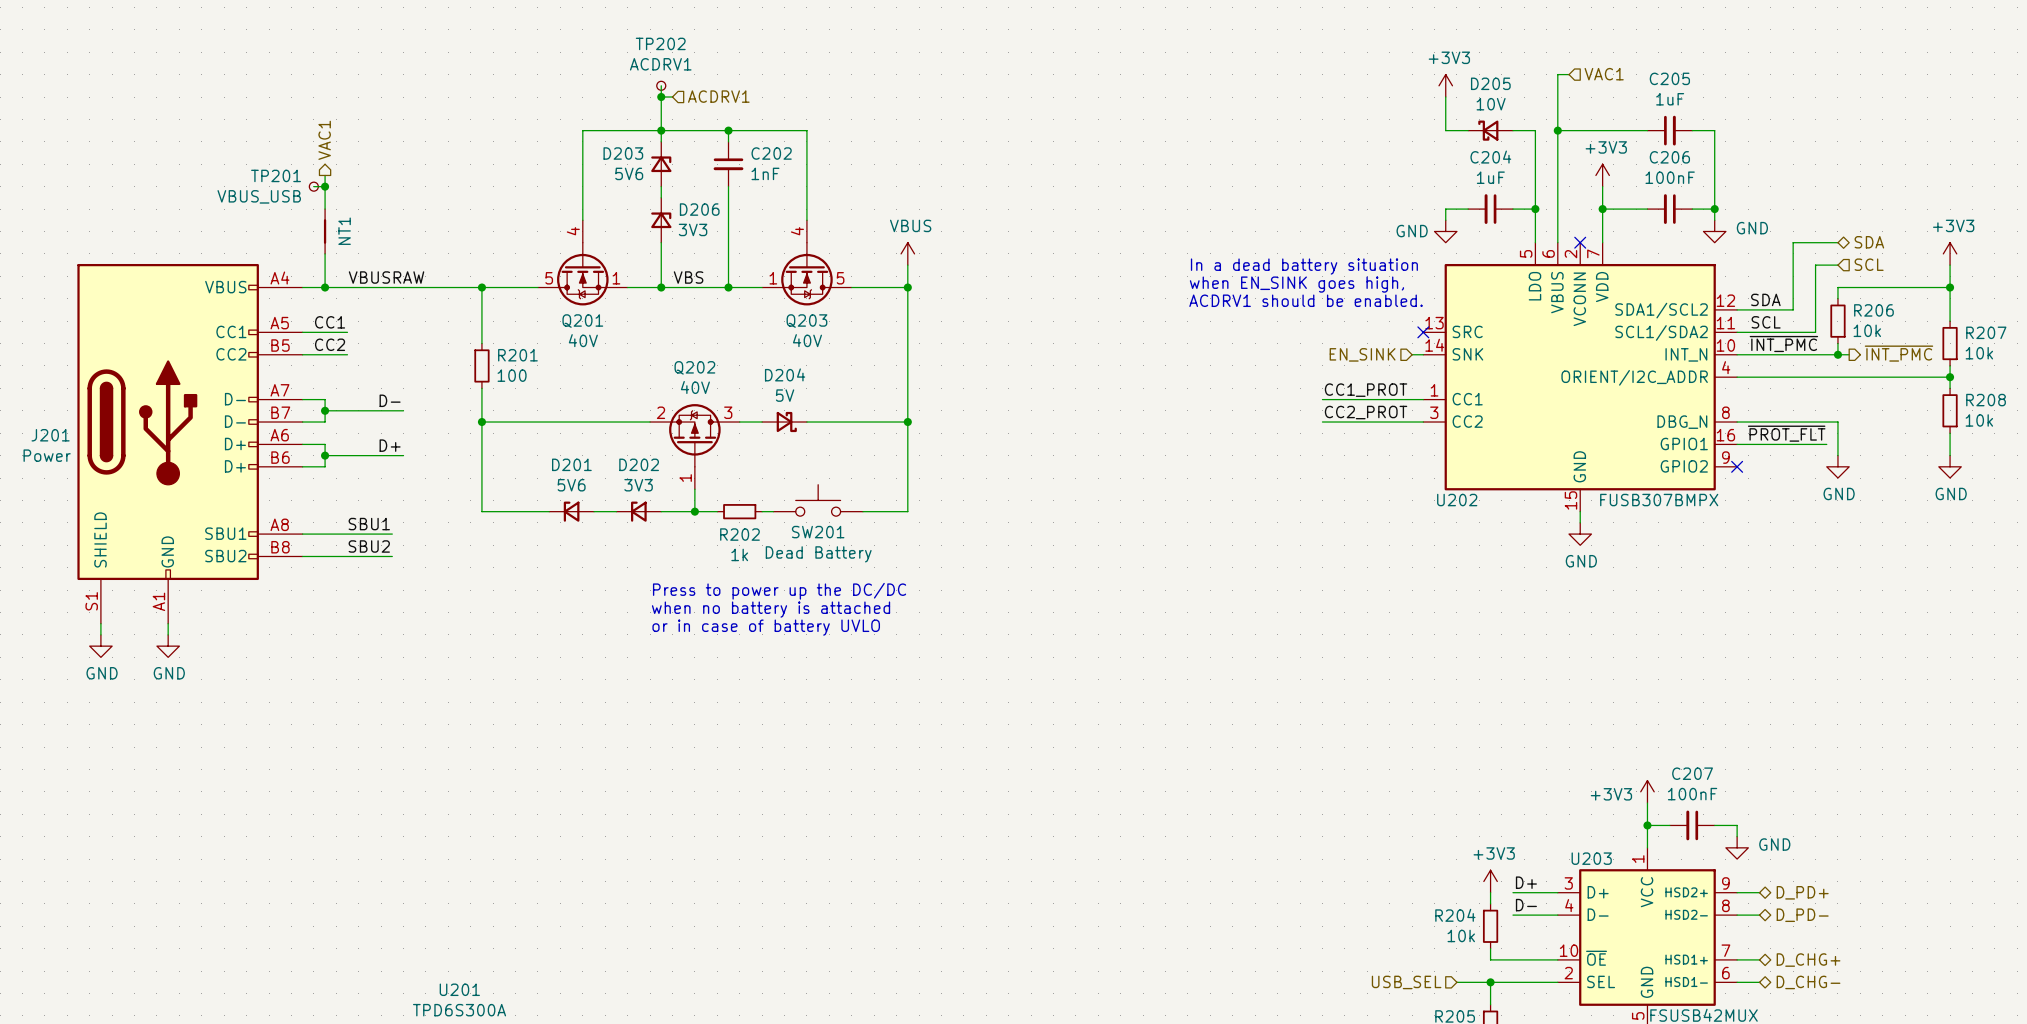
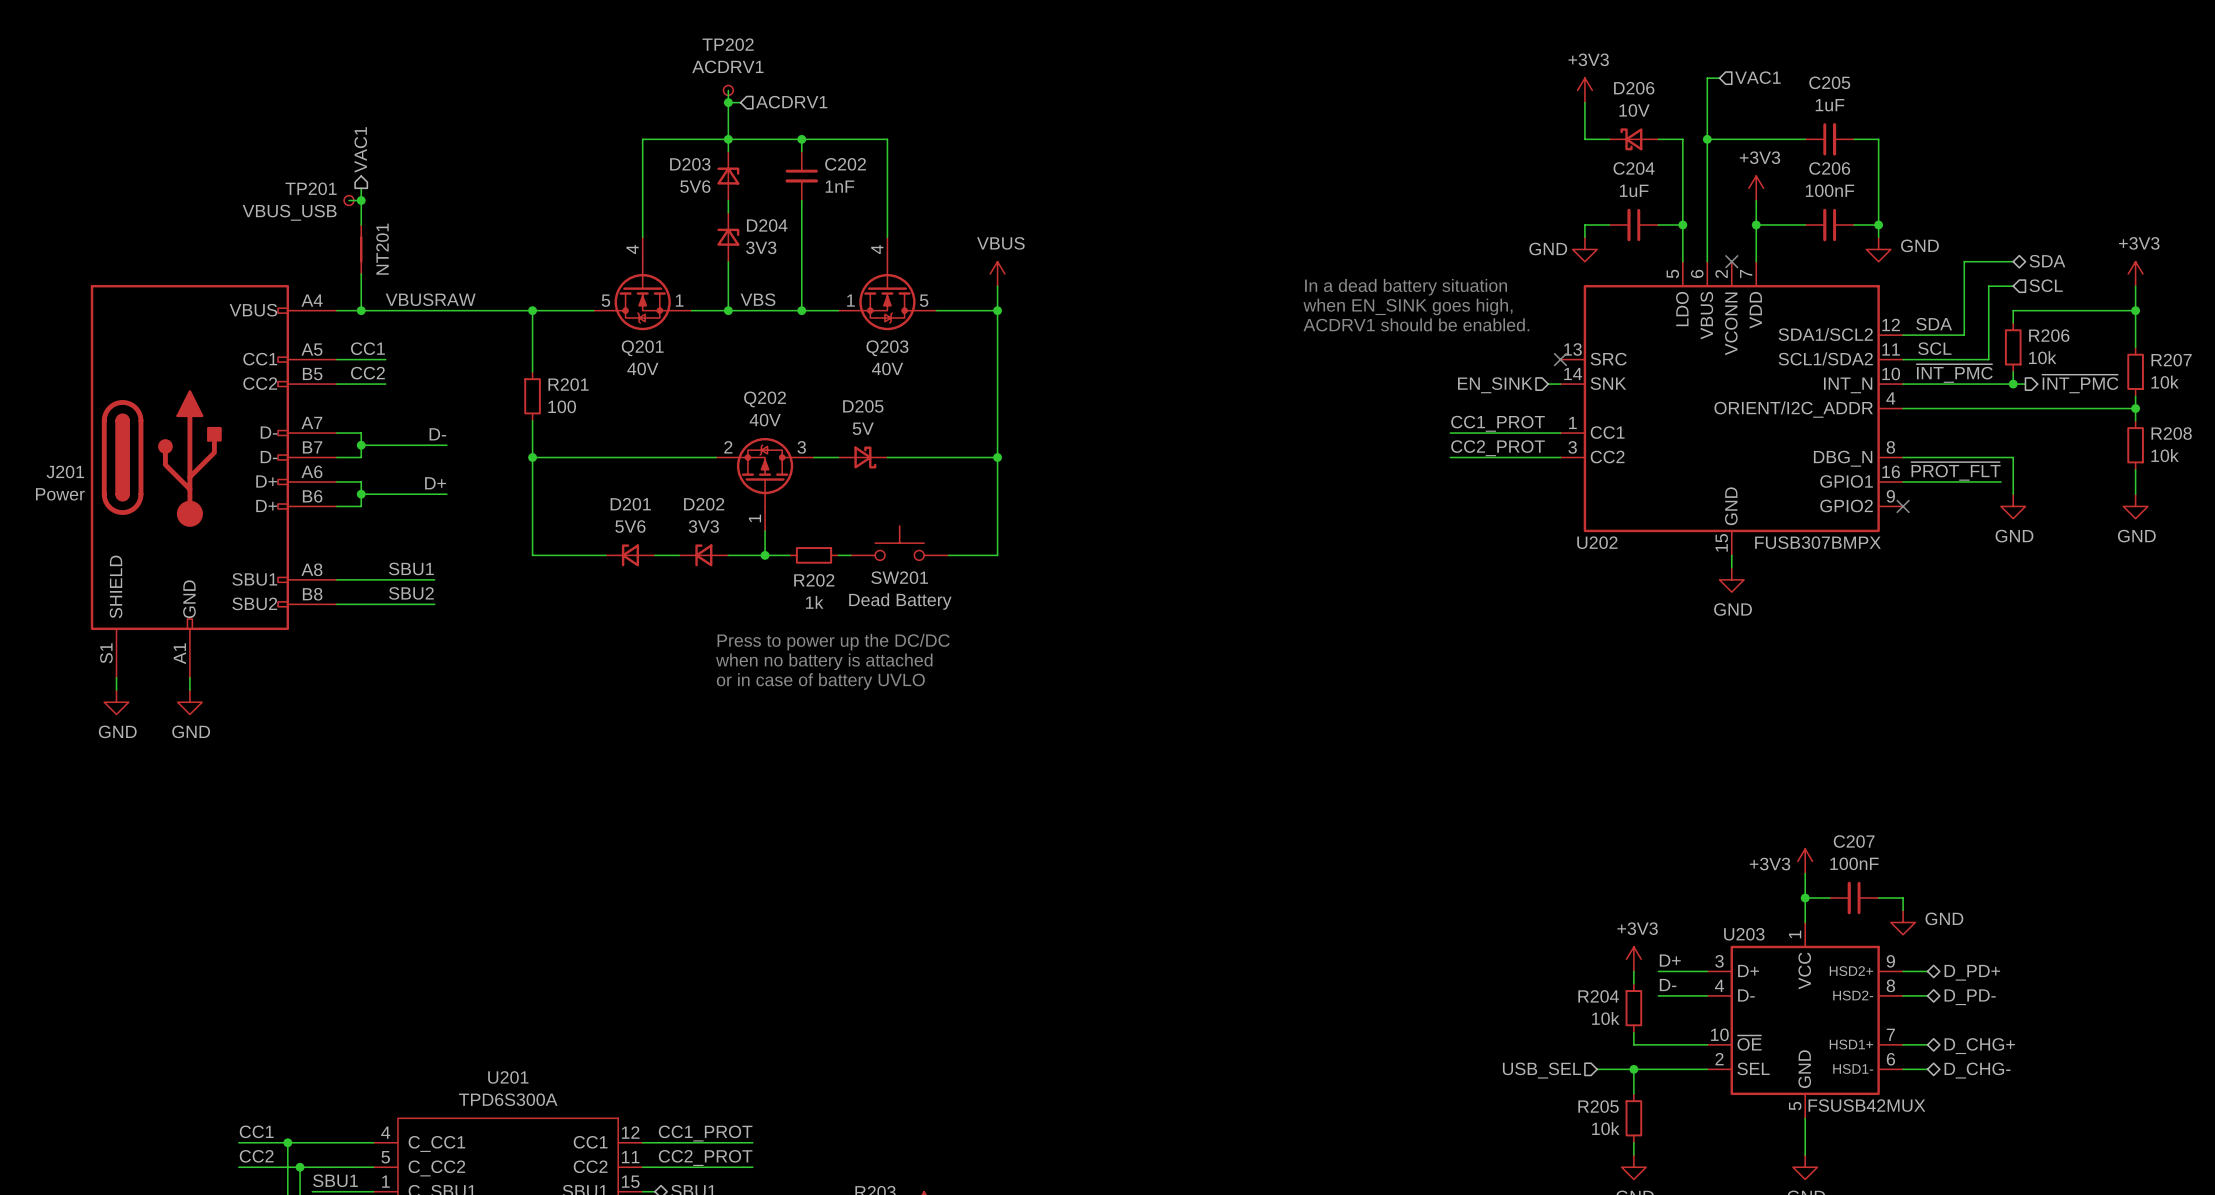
D205 name: D205 (1490, 83) -> D206 (1634, 88)
D206 name: D206 (699, 209) -> D204 (767, 225)
NT1 name: NT1 (344, 231) -> NT201 (382, 249)
D204 name: D204 (785, 374) -> D205 (863, 406)

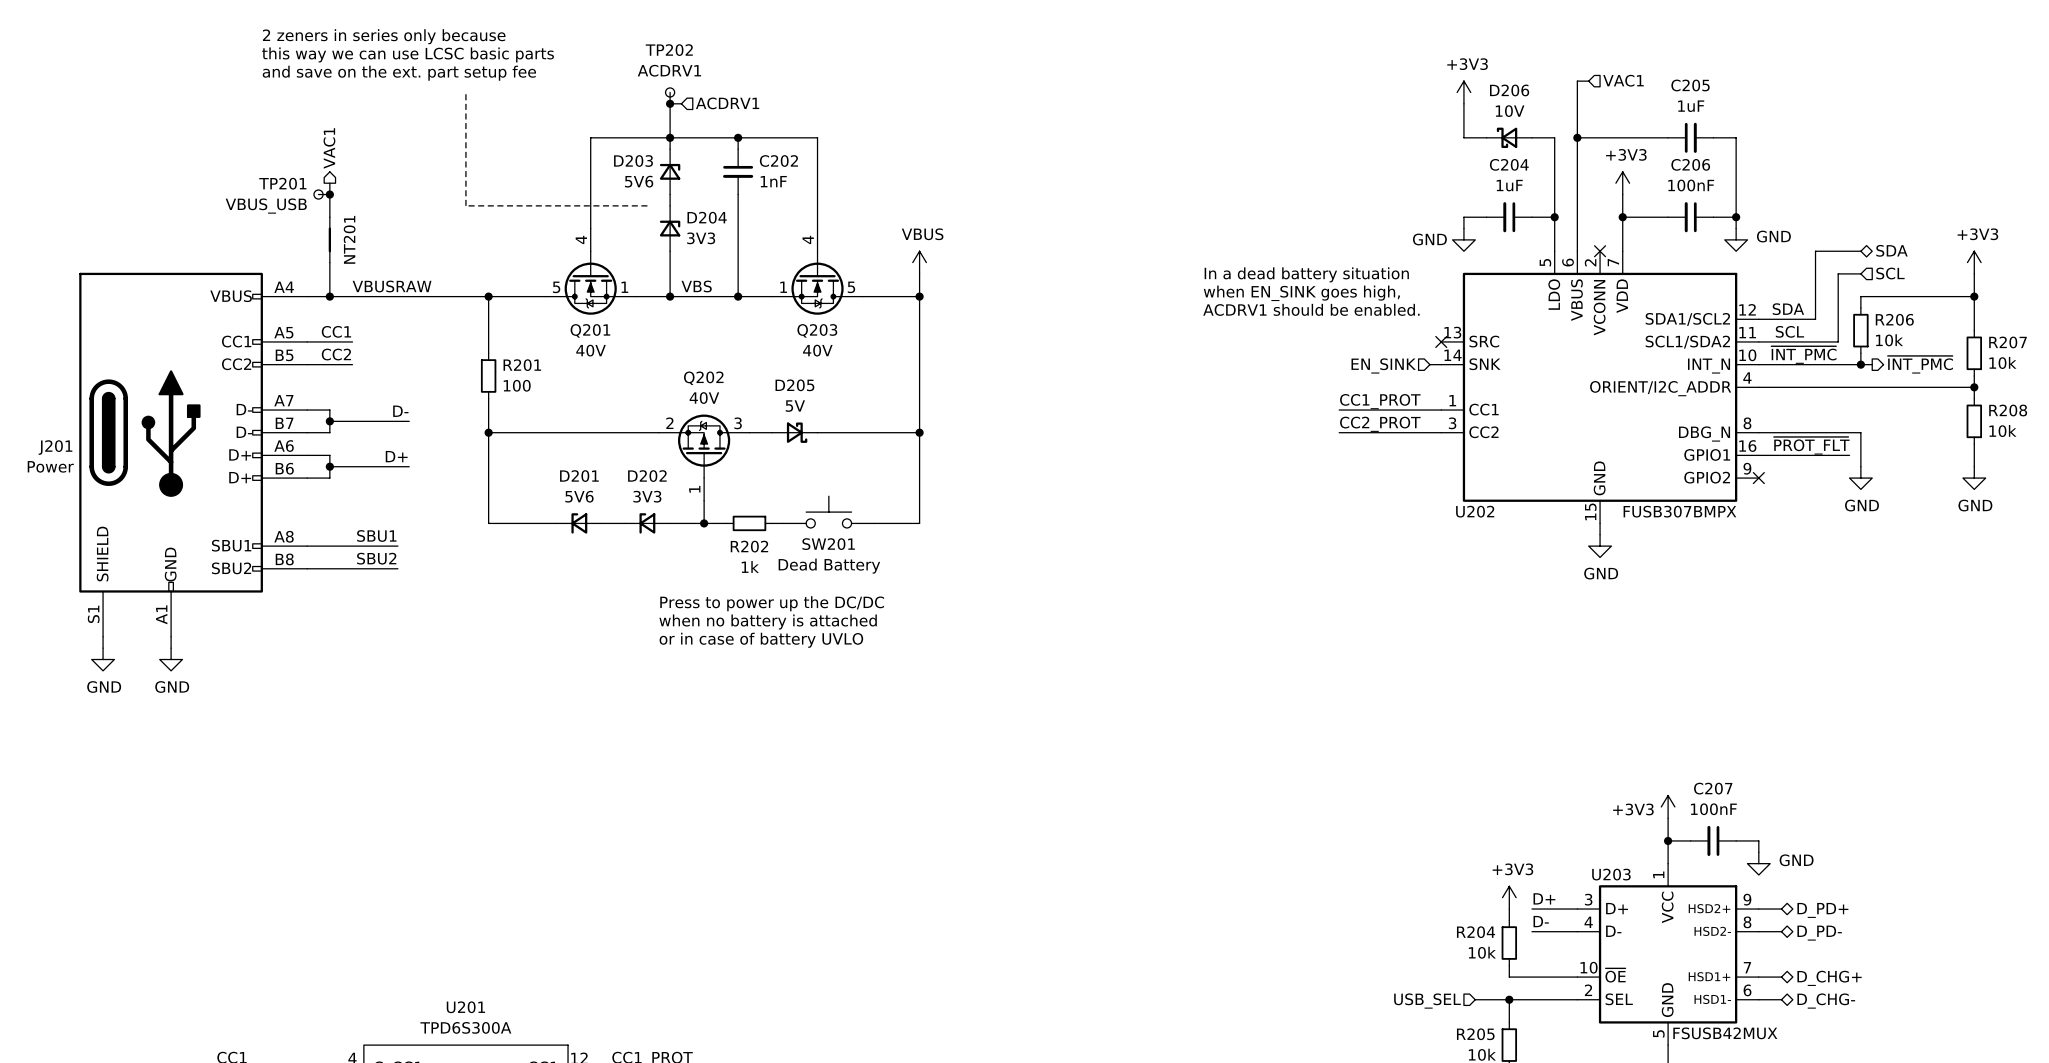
text: none -> 2 zeners in series only because (384, 36)
text: none -> this way we can use LCSC basic parts (408, 54)
text: none -> and save on the ext. part setup fee (399, 73)
line: none -> (465, 92) (465, 205) (647, 205)

